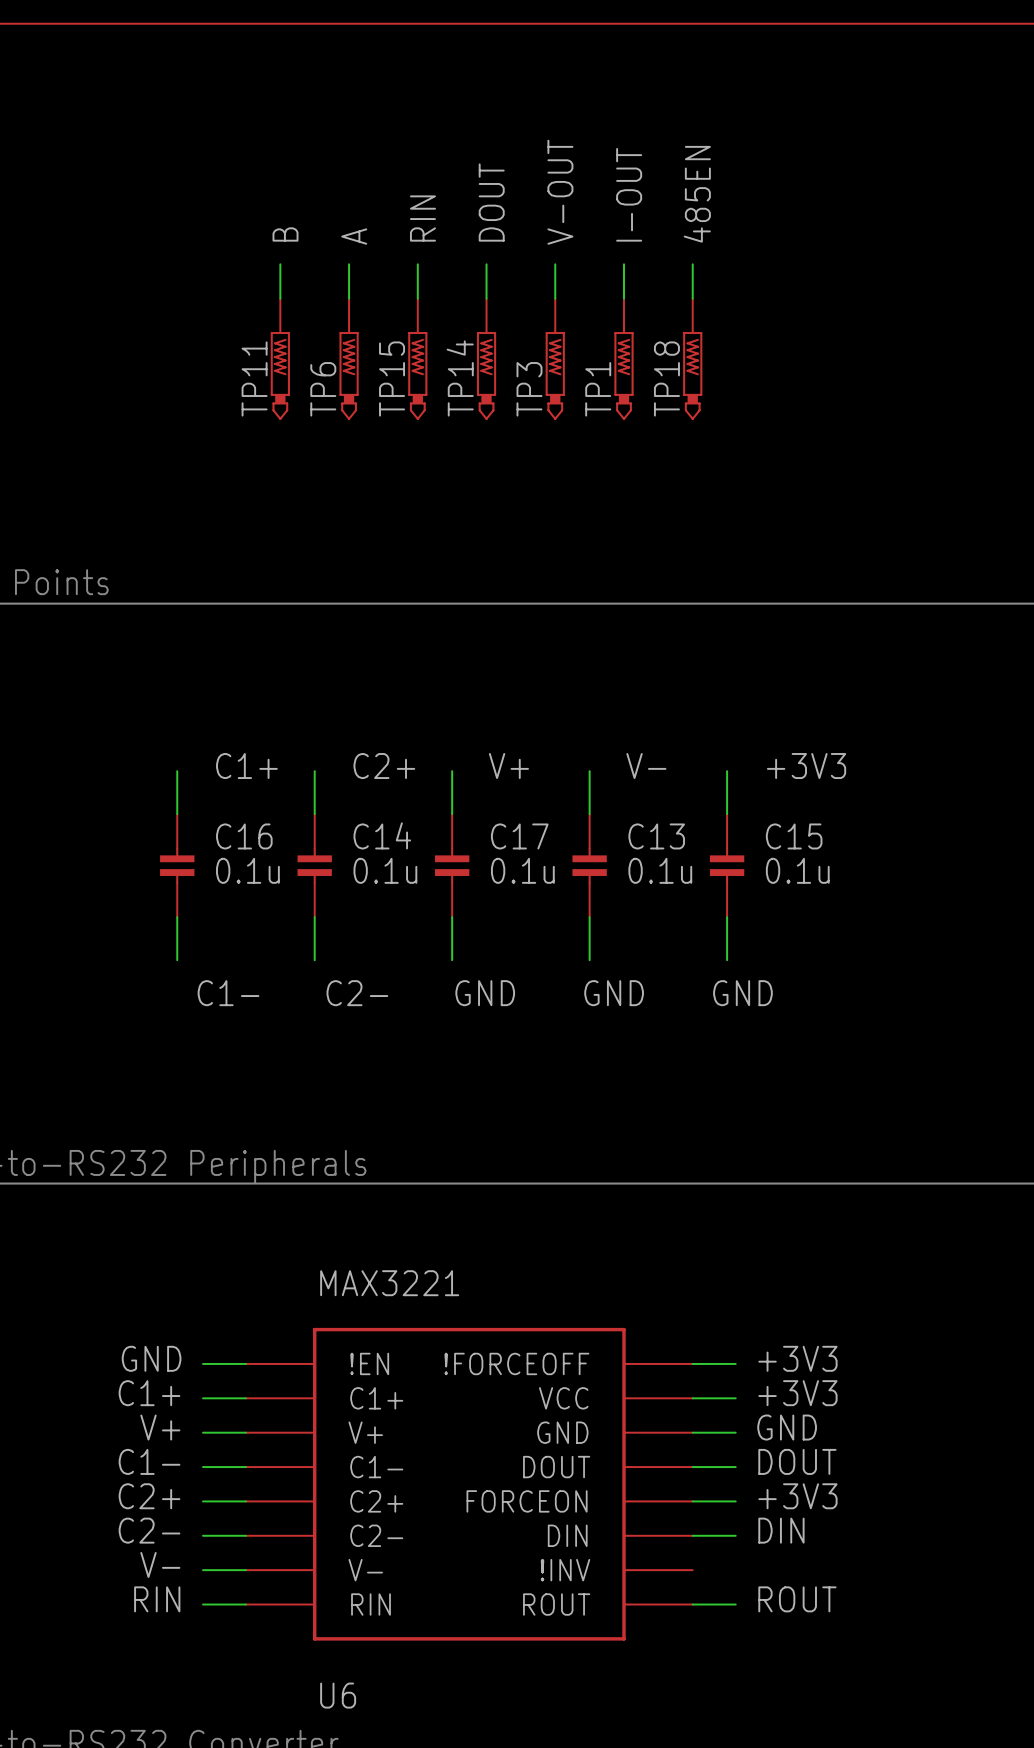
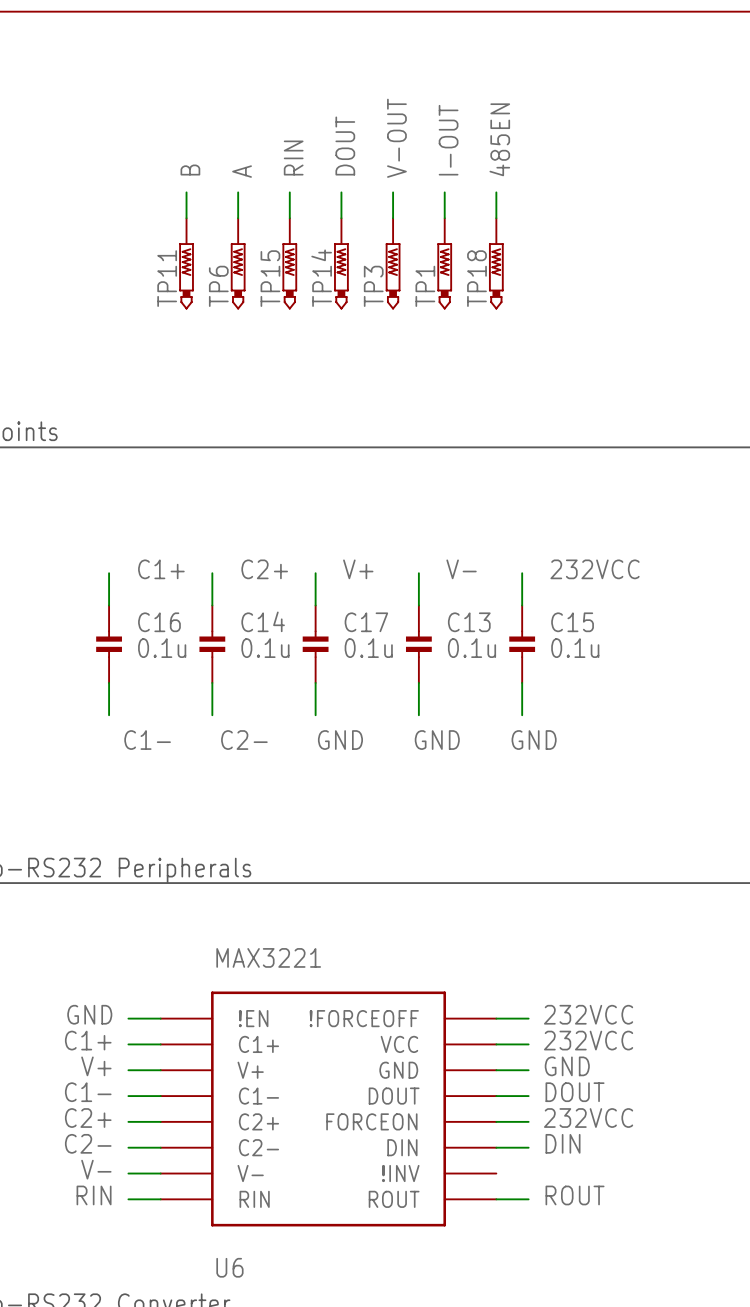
label: +3V3 (806, 766) -> 232VCC (595, 569)
label: +3V3 (797, 1358) -> 232VCC (588, 1014)
label: +3V3 (797, 1393) -> 232VCC (588, 1040)
label: +3V3 (797, 1496) -> 232VCC (588, 1118)

